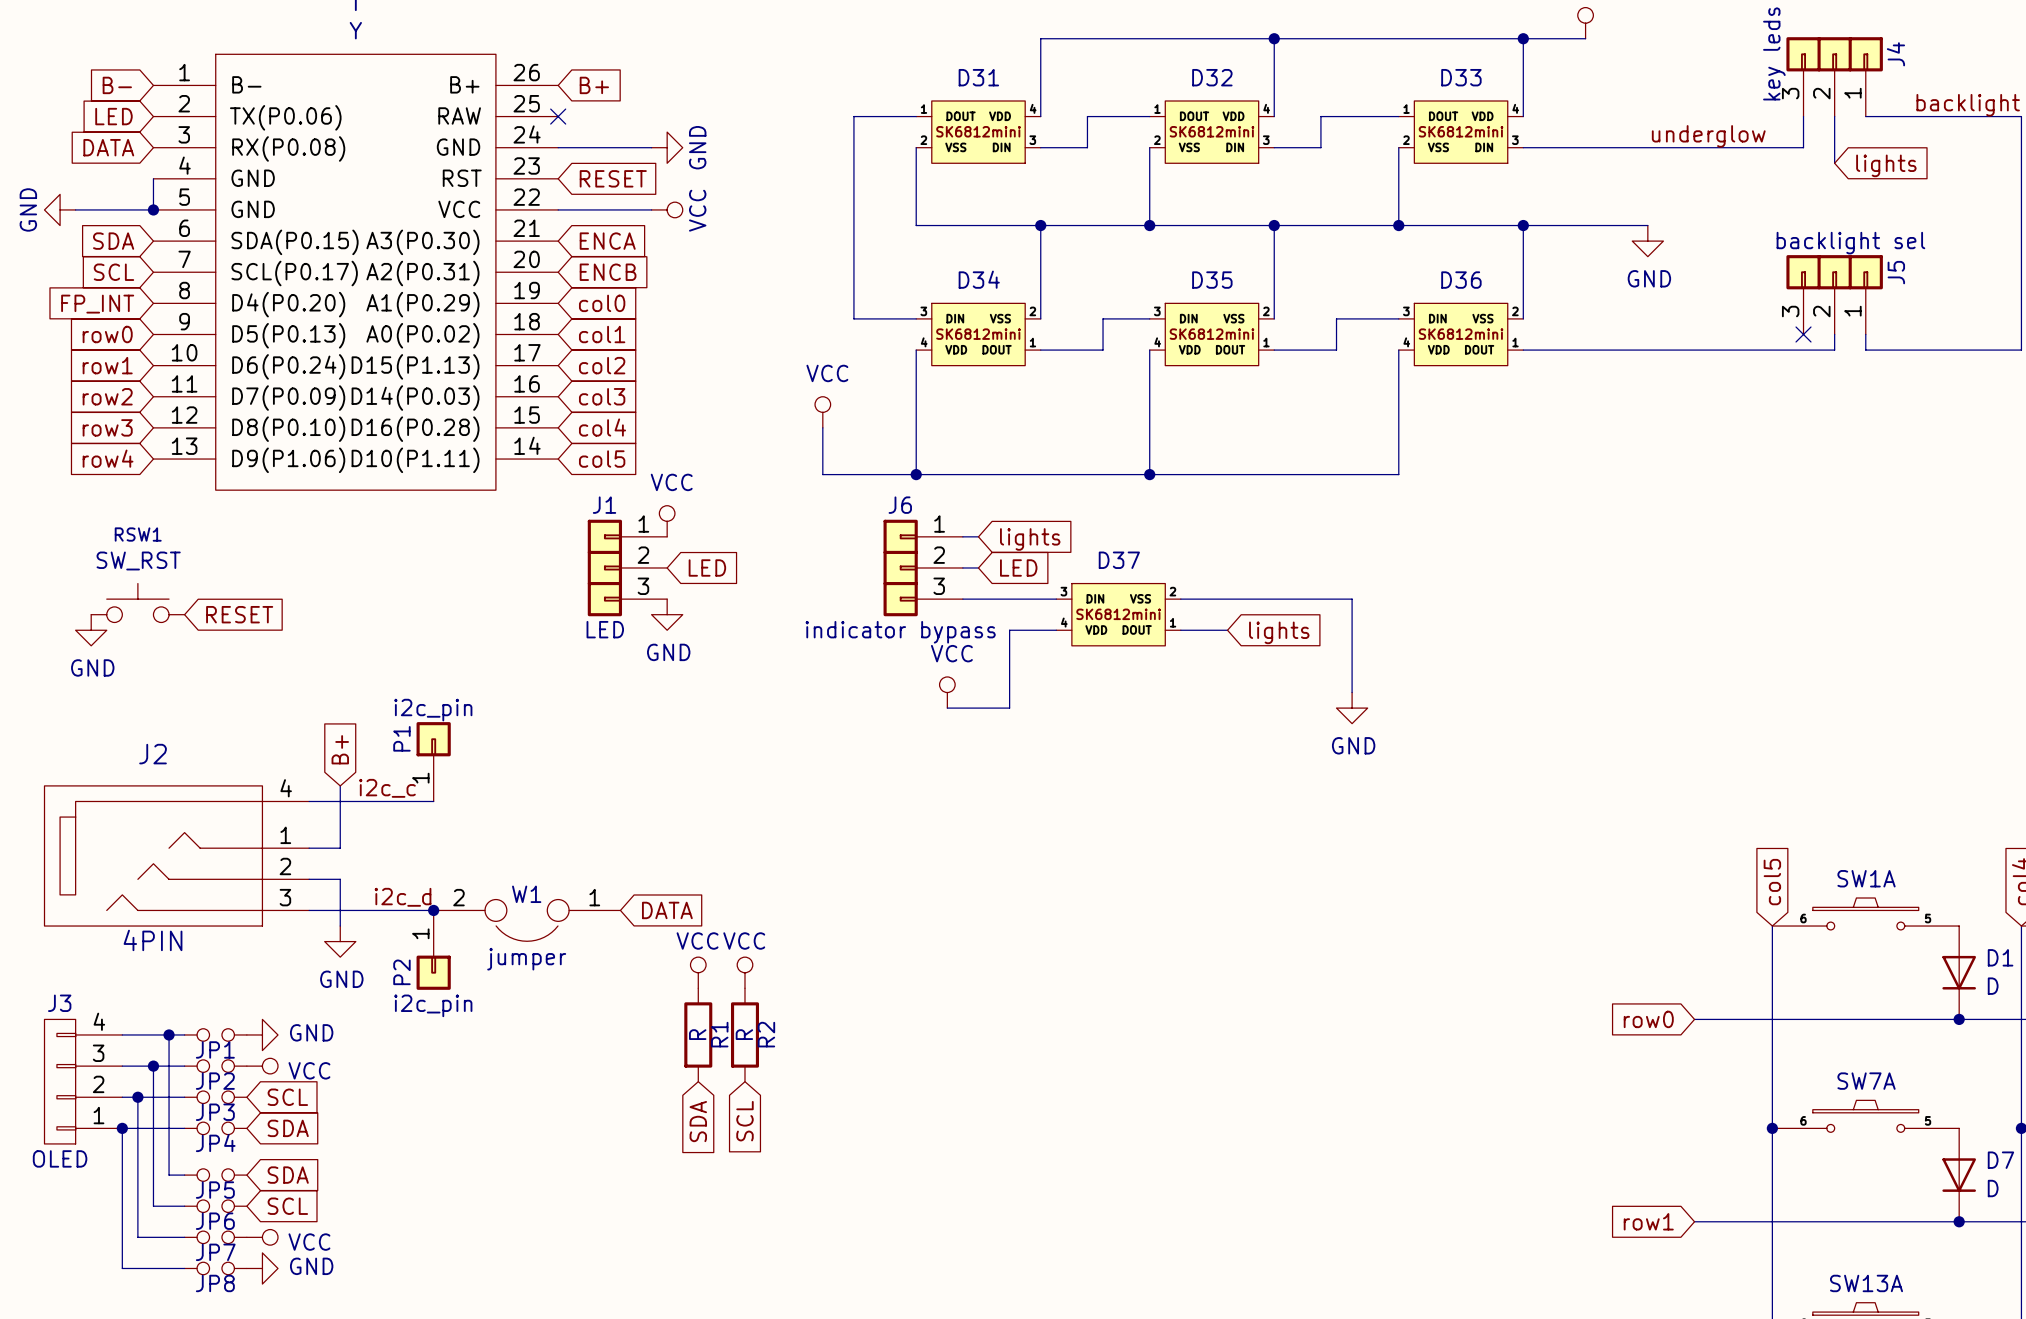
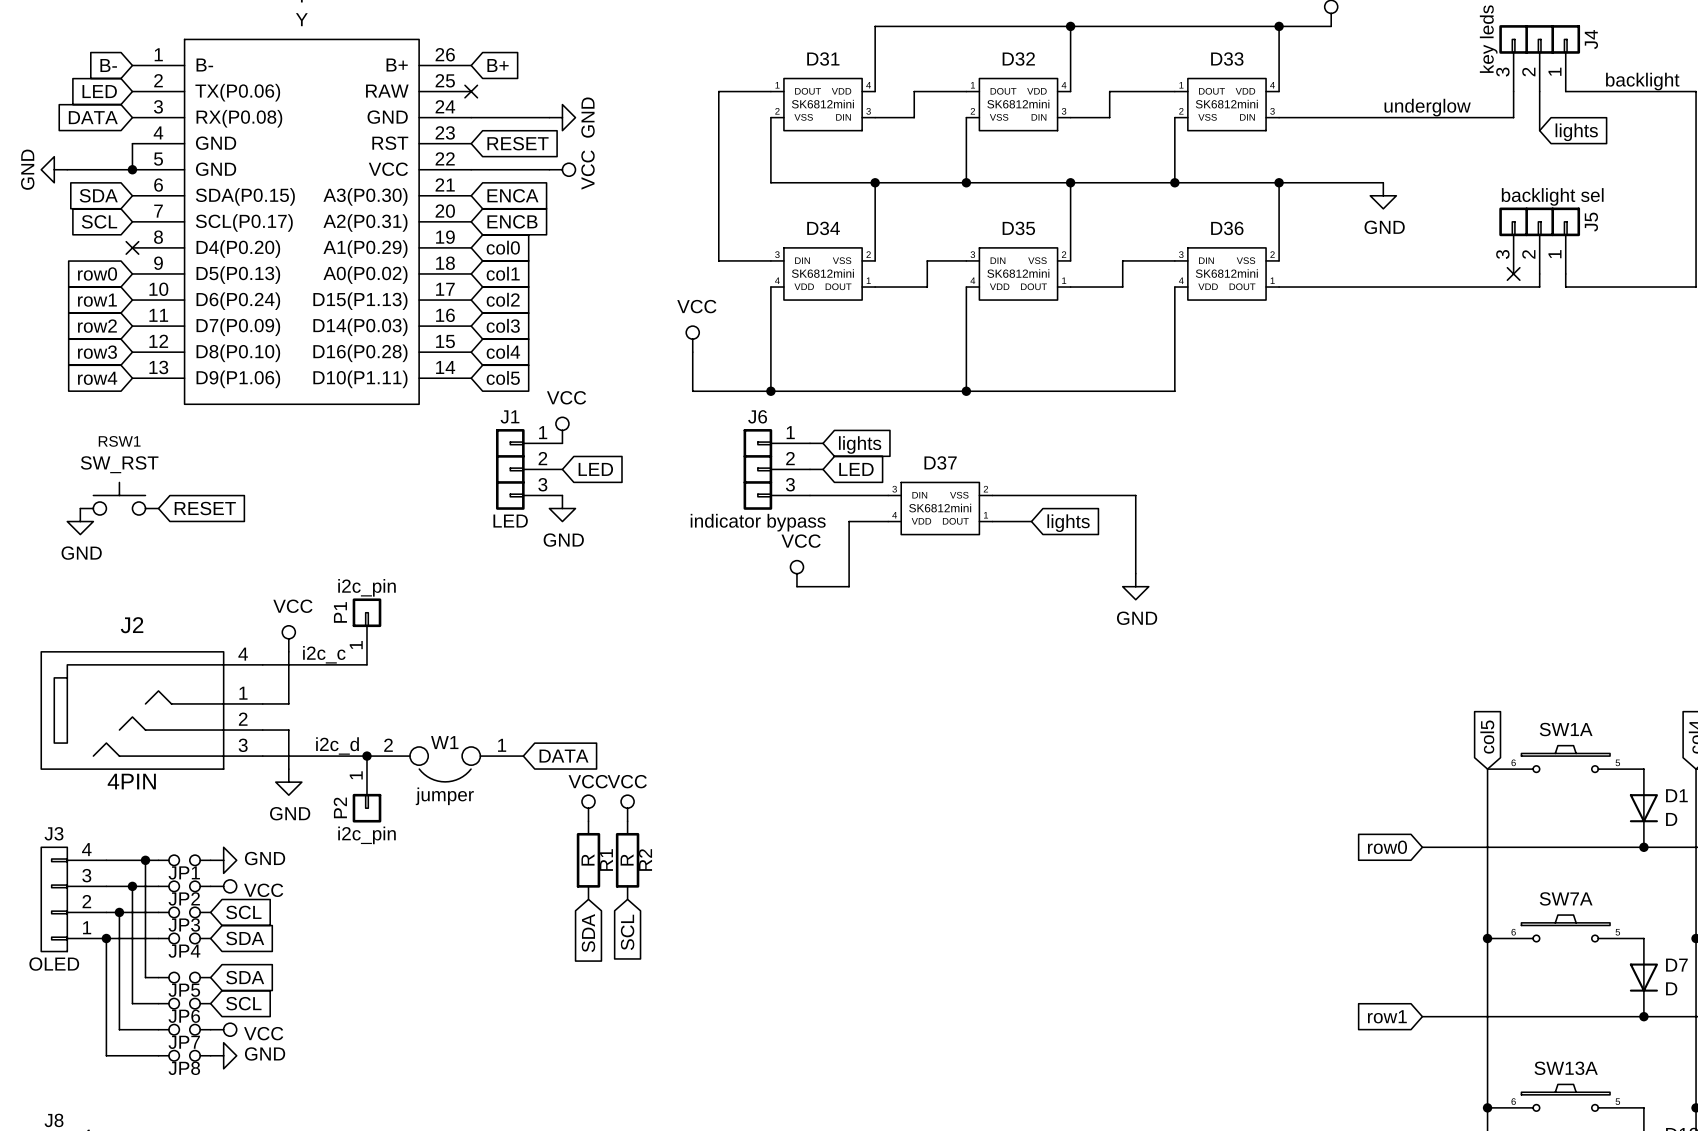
no-connect mark: none -> (132, 247)
global label: FP_INT (97, 304) -> none
global label: B+ (340, 749) -> none
power symbol: none -> VCC (288, 638)

